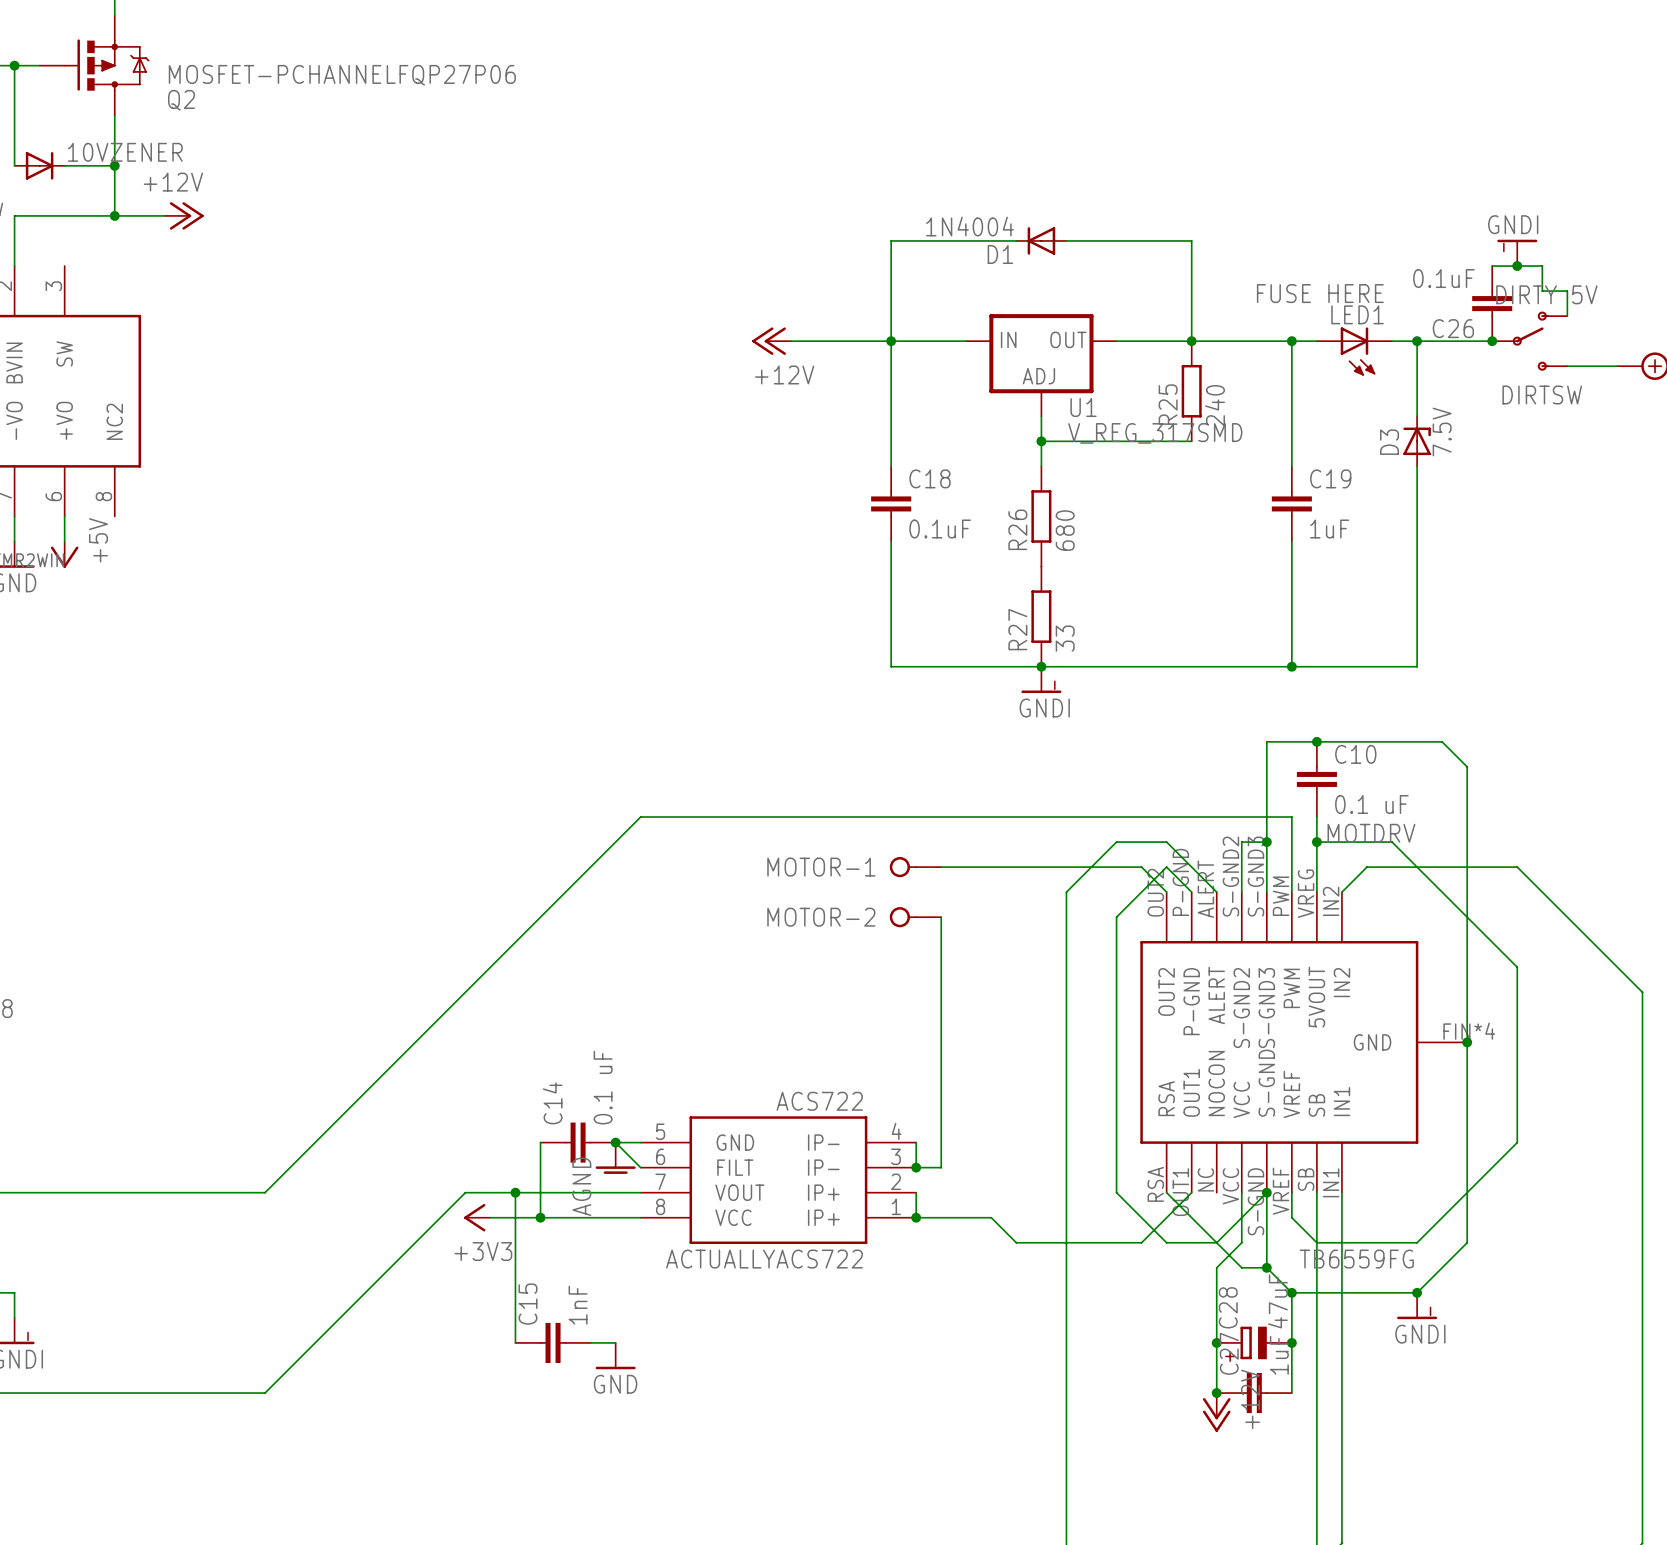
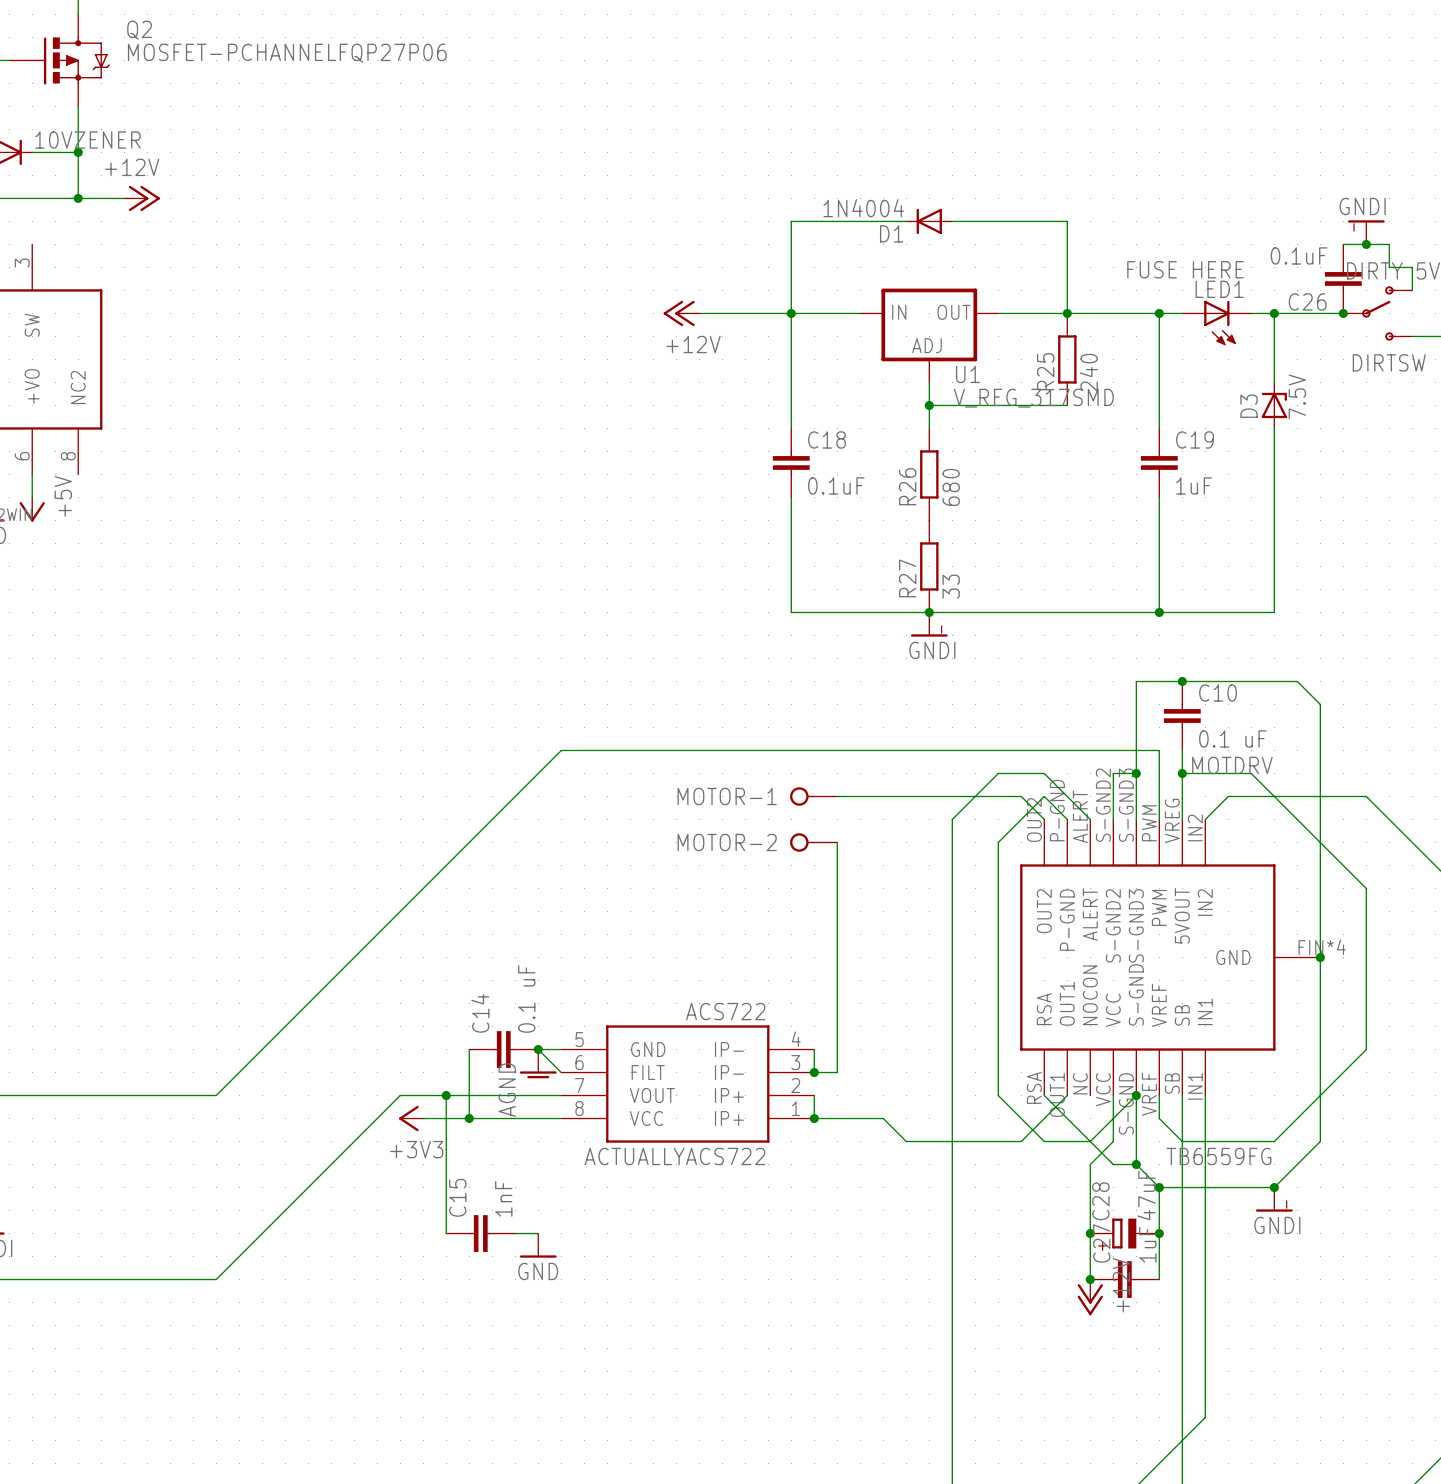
Q2 flip: as is (106, 65) -> up-down (70, 60)

